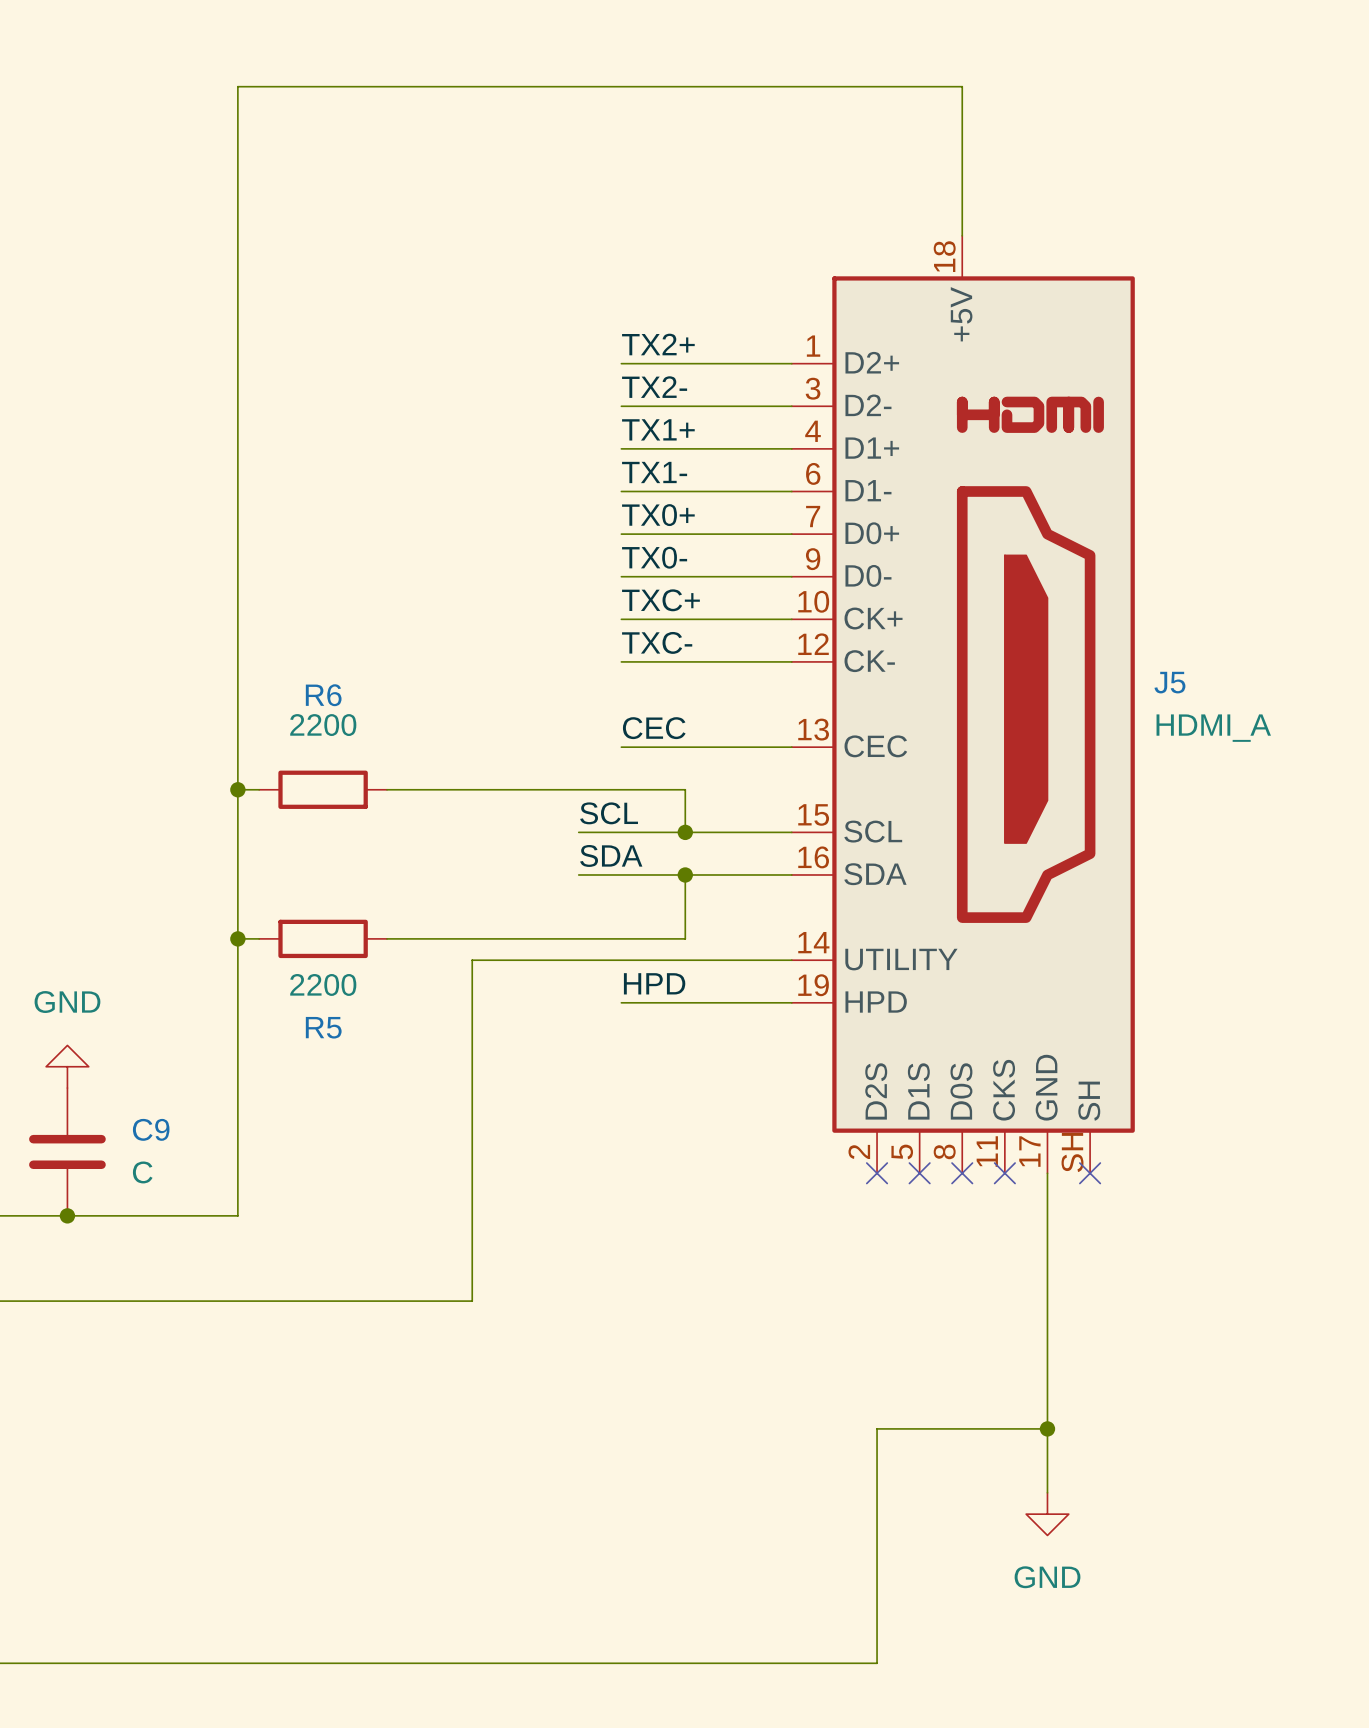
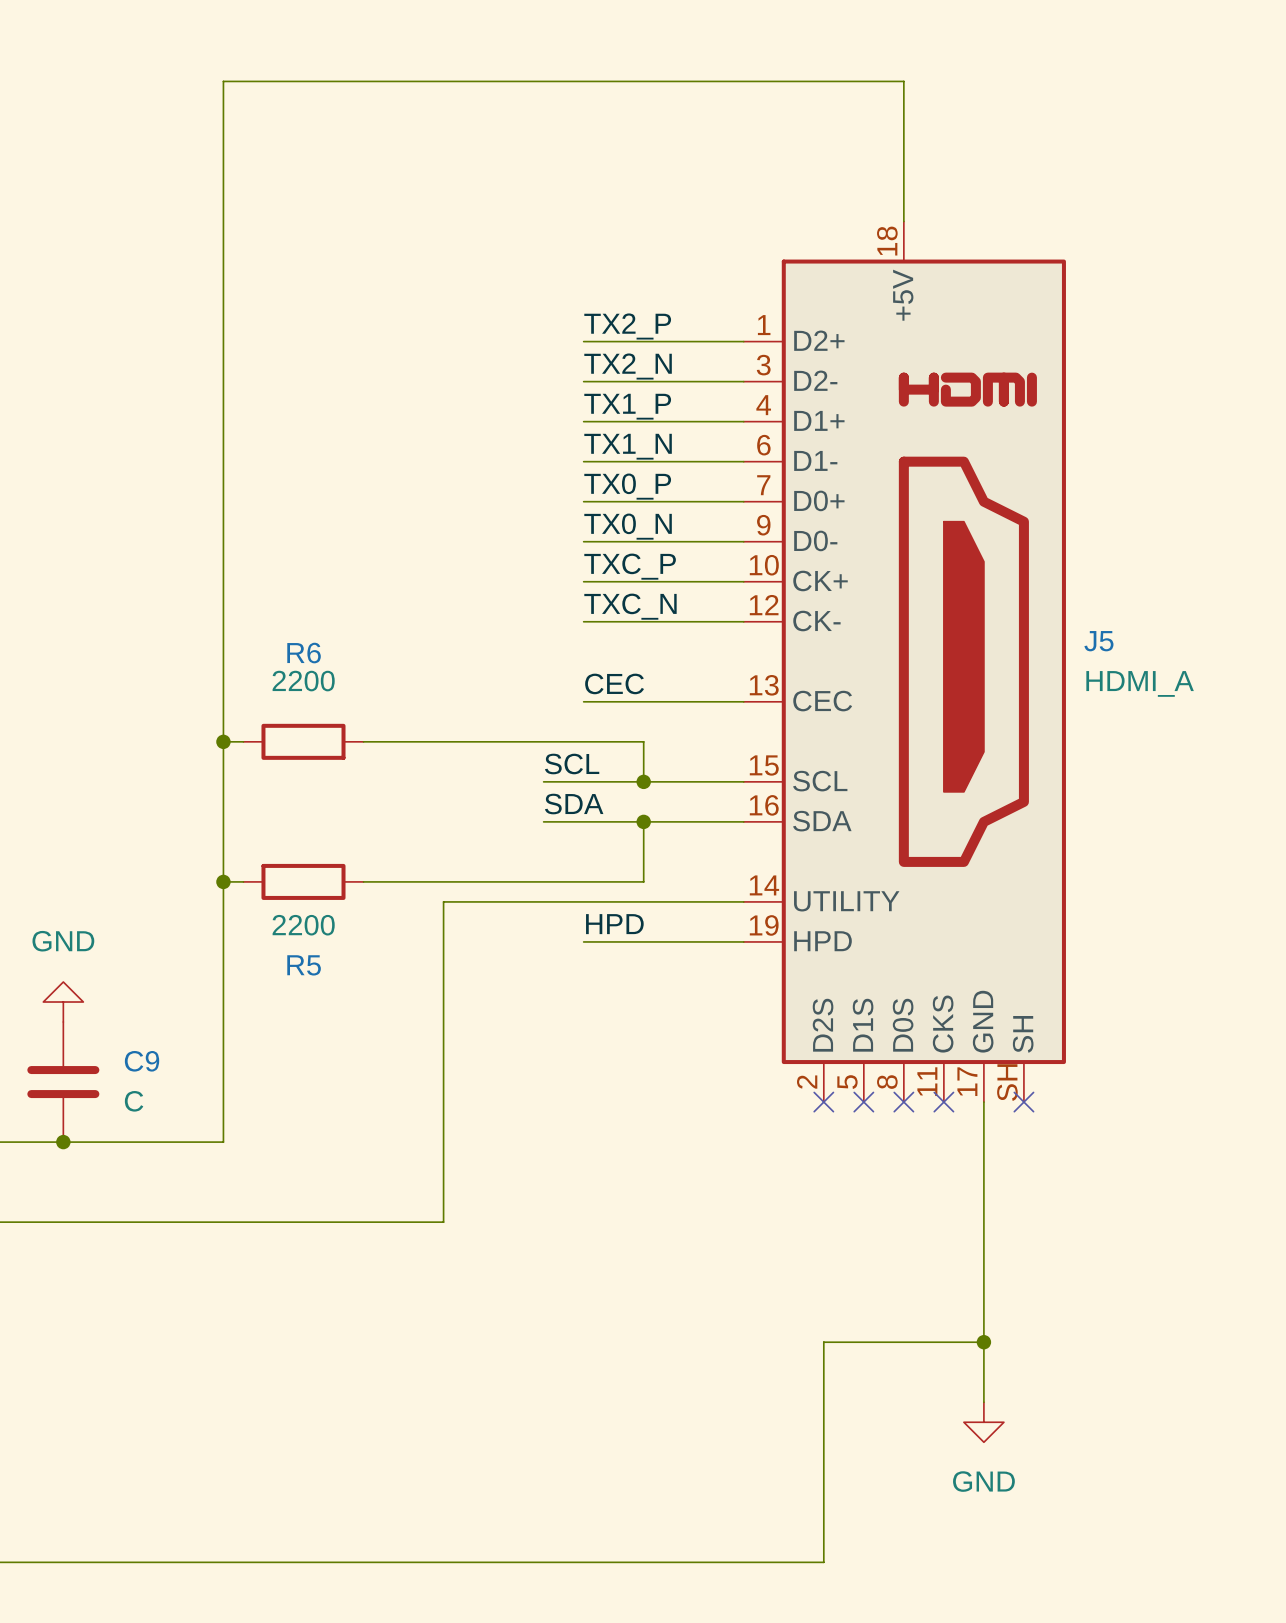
label: TX2+ (658, 344) -> TX2_P (627, 326)
label: TX2- (654, 387) -> TX2_N (628, 366)
label: TX1+ (658, 429) -> TX1_P (627, 406)
label: TX1- (654, 472) -> TX1_N (628, 446)
label: TX0+ (658, 515) -> TX0_P (627, 486)
label: TX0- (654, 557) -> TX0_N (628, 526)
label: TXC+ (660, 600) -> TXC_P (630, 566)
label: TXC- (657, 642) -> TXC_N (630, 606)

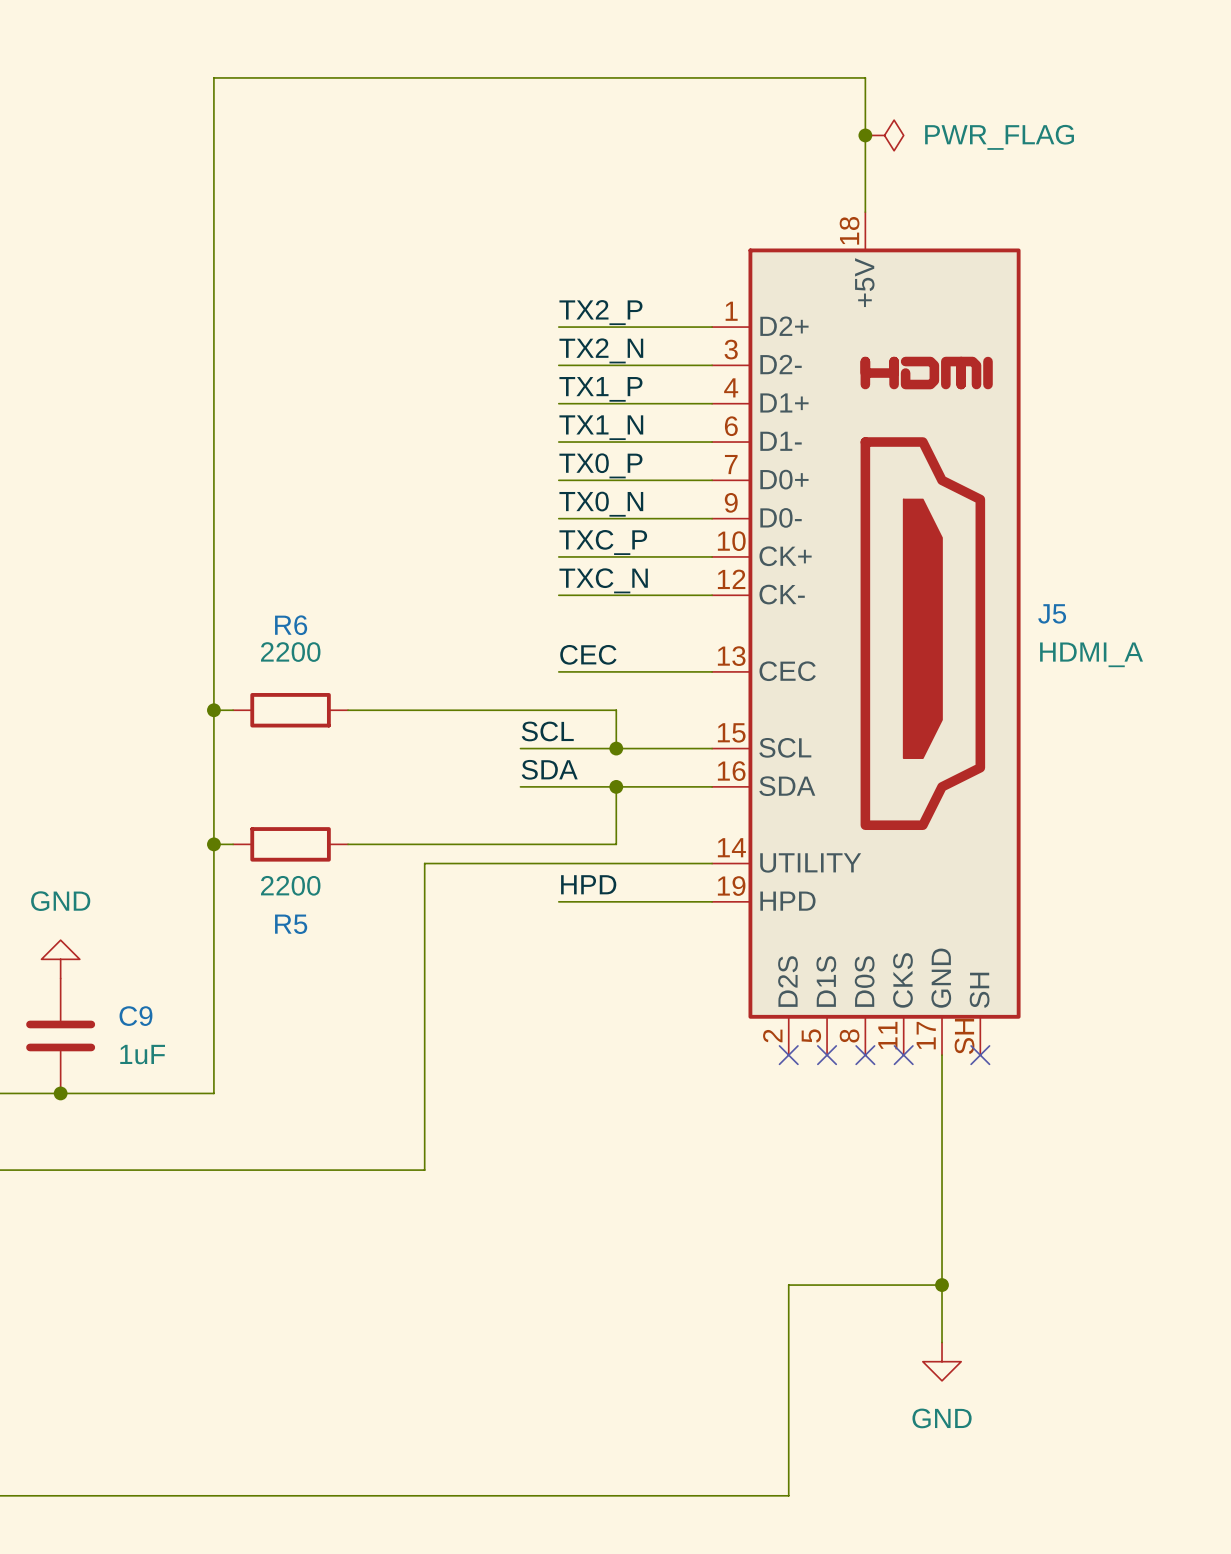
junction: none -> (865, 135)
power symbol: none -> PWR_FLAG (884, 135)
C9 value: C (134, 1101) -> 1uF (142, 1054)

